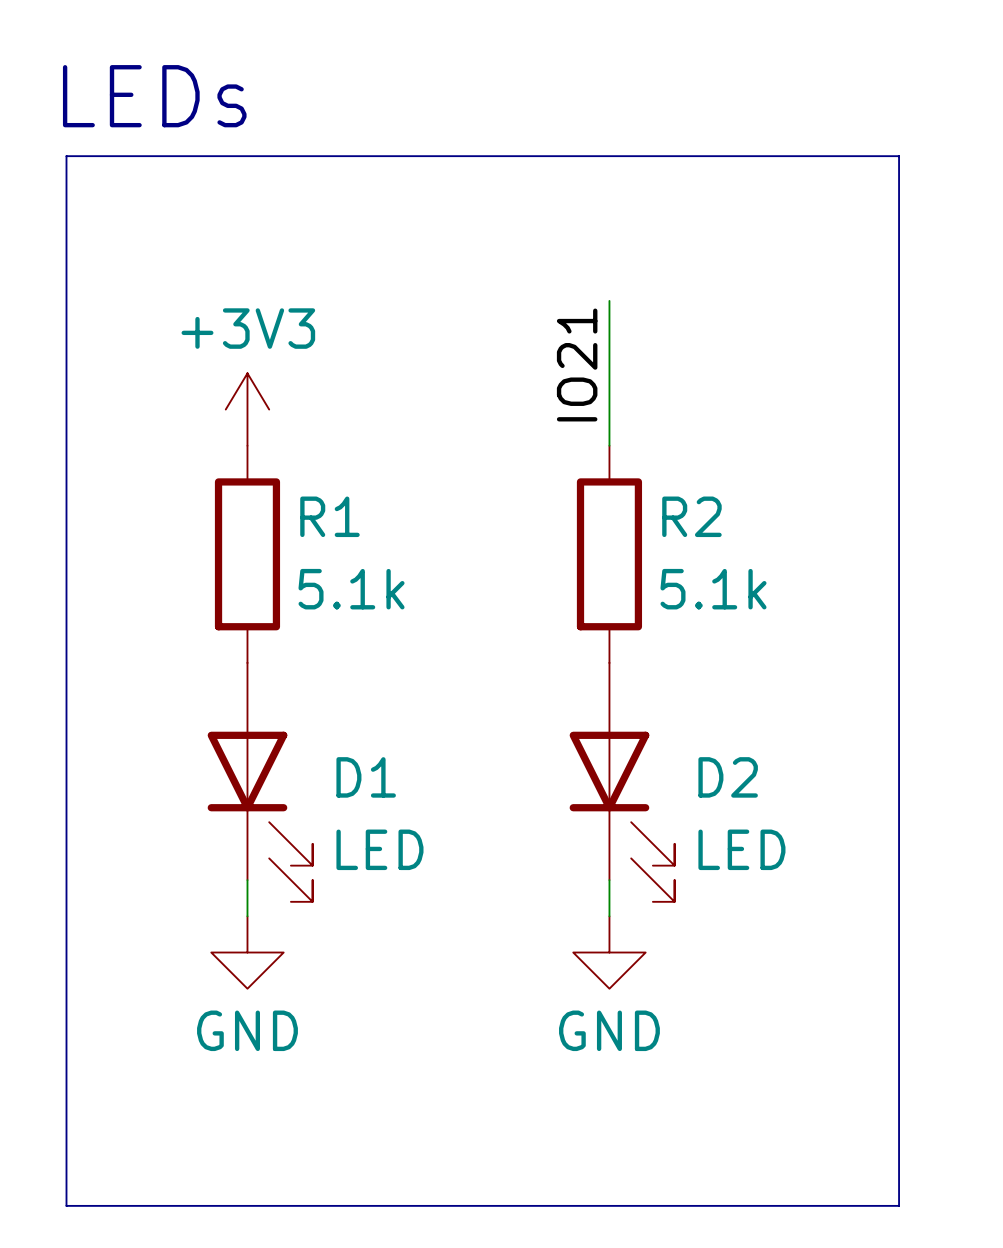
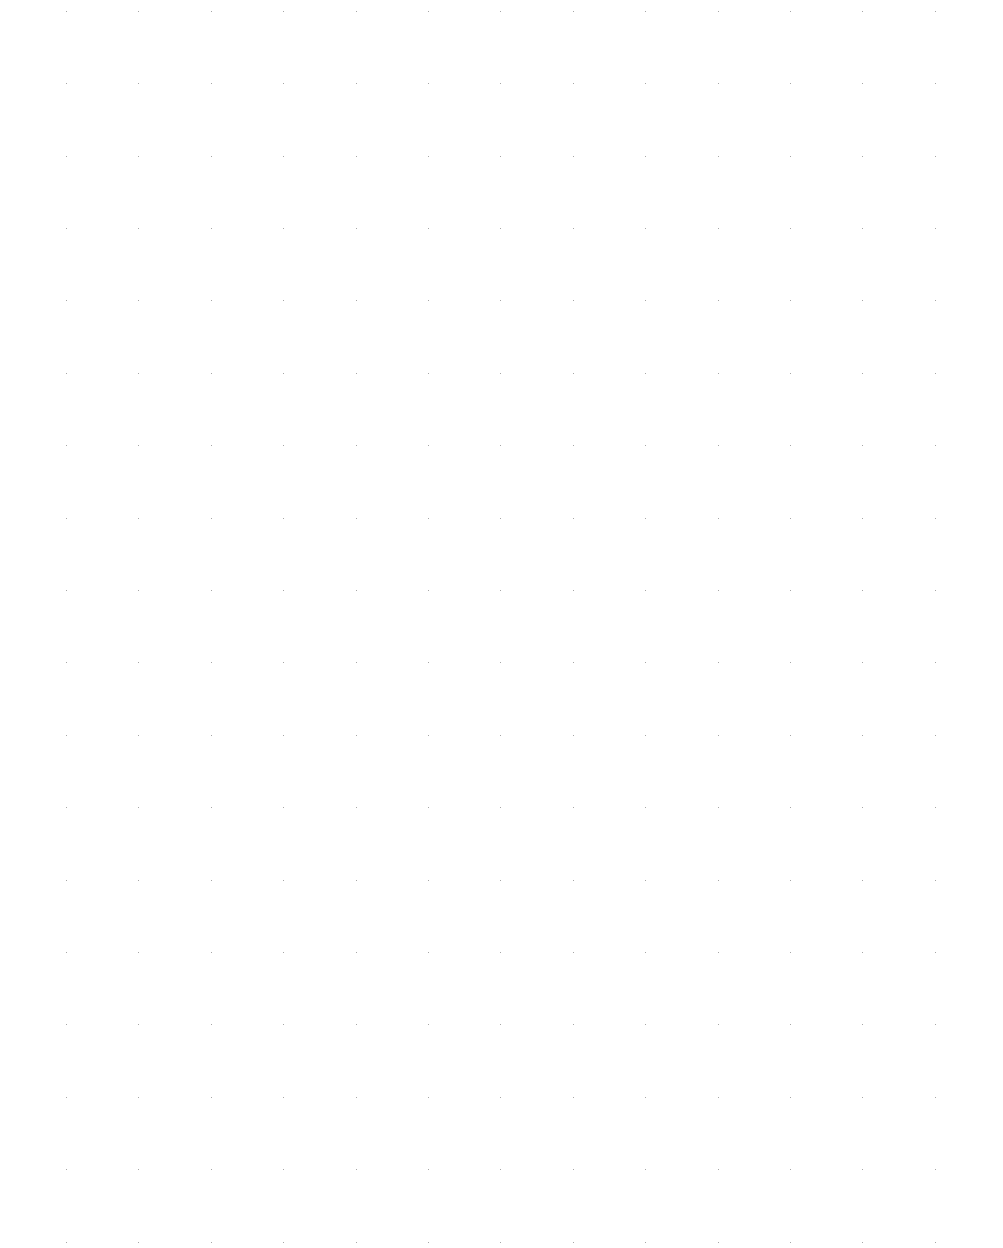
text: LEDs (154, 96) -> none
line: (66, 156) (66, 1205) (899, 1205) (899, 156) (66, 156) -> none
wire: (609, 300) (609, 445) -> none
label: IO21 (577, 365) -> none
power symbol: +3V3 (247, 409) -> none
R1: 5.1k (247, 554) -> none
R2: 5.1k (609, 554) -> none
D1: LED (260, 782) -> none
D2: LED (622, 782) -> none
wire: (247, 880) (247, 916) -> none
wire: (609, 880) (609, 916) -> none
power symbol: GND (247, 952) -> none
power symbol: GND (609, 952) -> none

